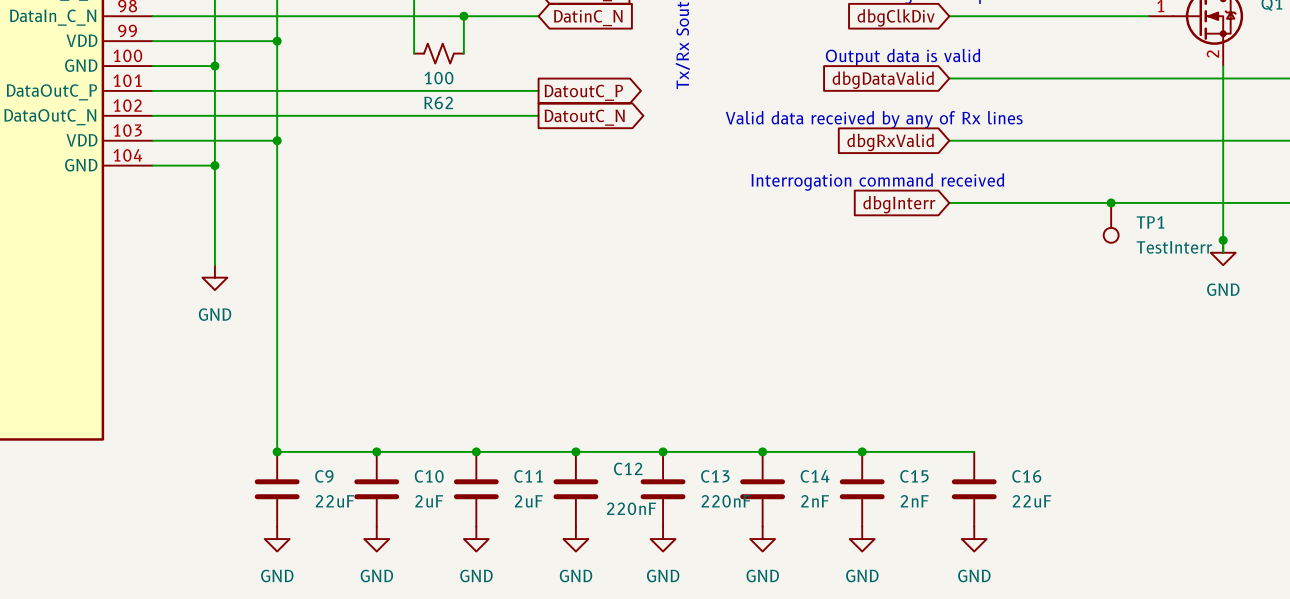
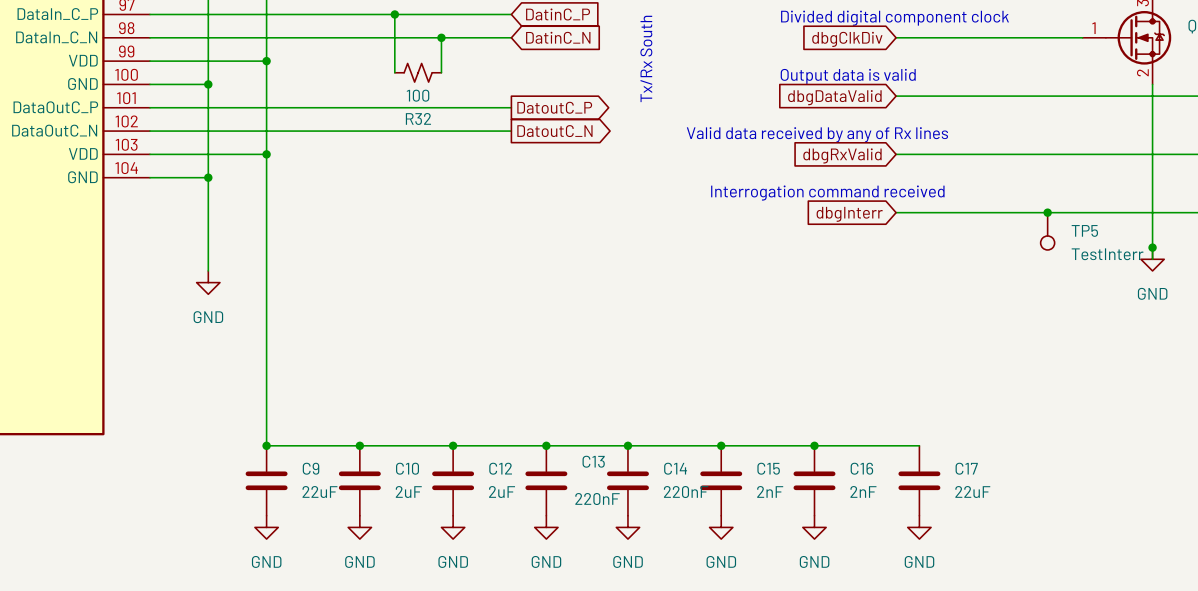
R62 name: R62 (438, 102) -> R32 (418, 118)
TP1 name: TP1 (1150, 222) -> TP5 (1084, 230)
C12 name: C12 (628, 468) -> C13 (593, 461)
C11 name: C11 (528, 476) -> C12 (500, 468)
C13 name: C13 (715, 476) -> C14 (675, 468)
C14 name: C14 (815, 476) -> C15 (768, 468)
C15 name: C15 (914, 476) -> C16 (861, 468)
C16 name: C16 (1026, 476) -> C17 (966, 468)

